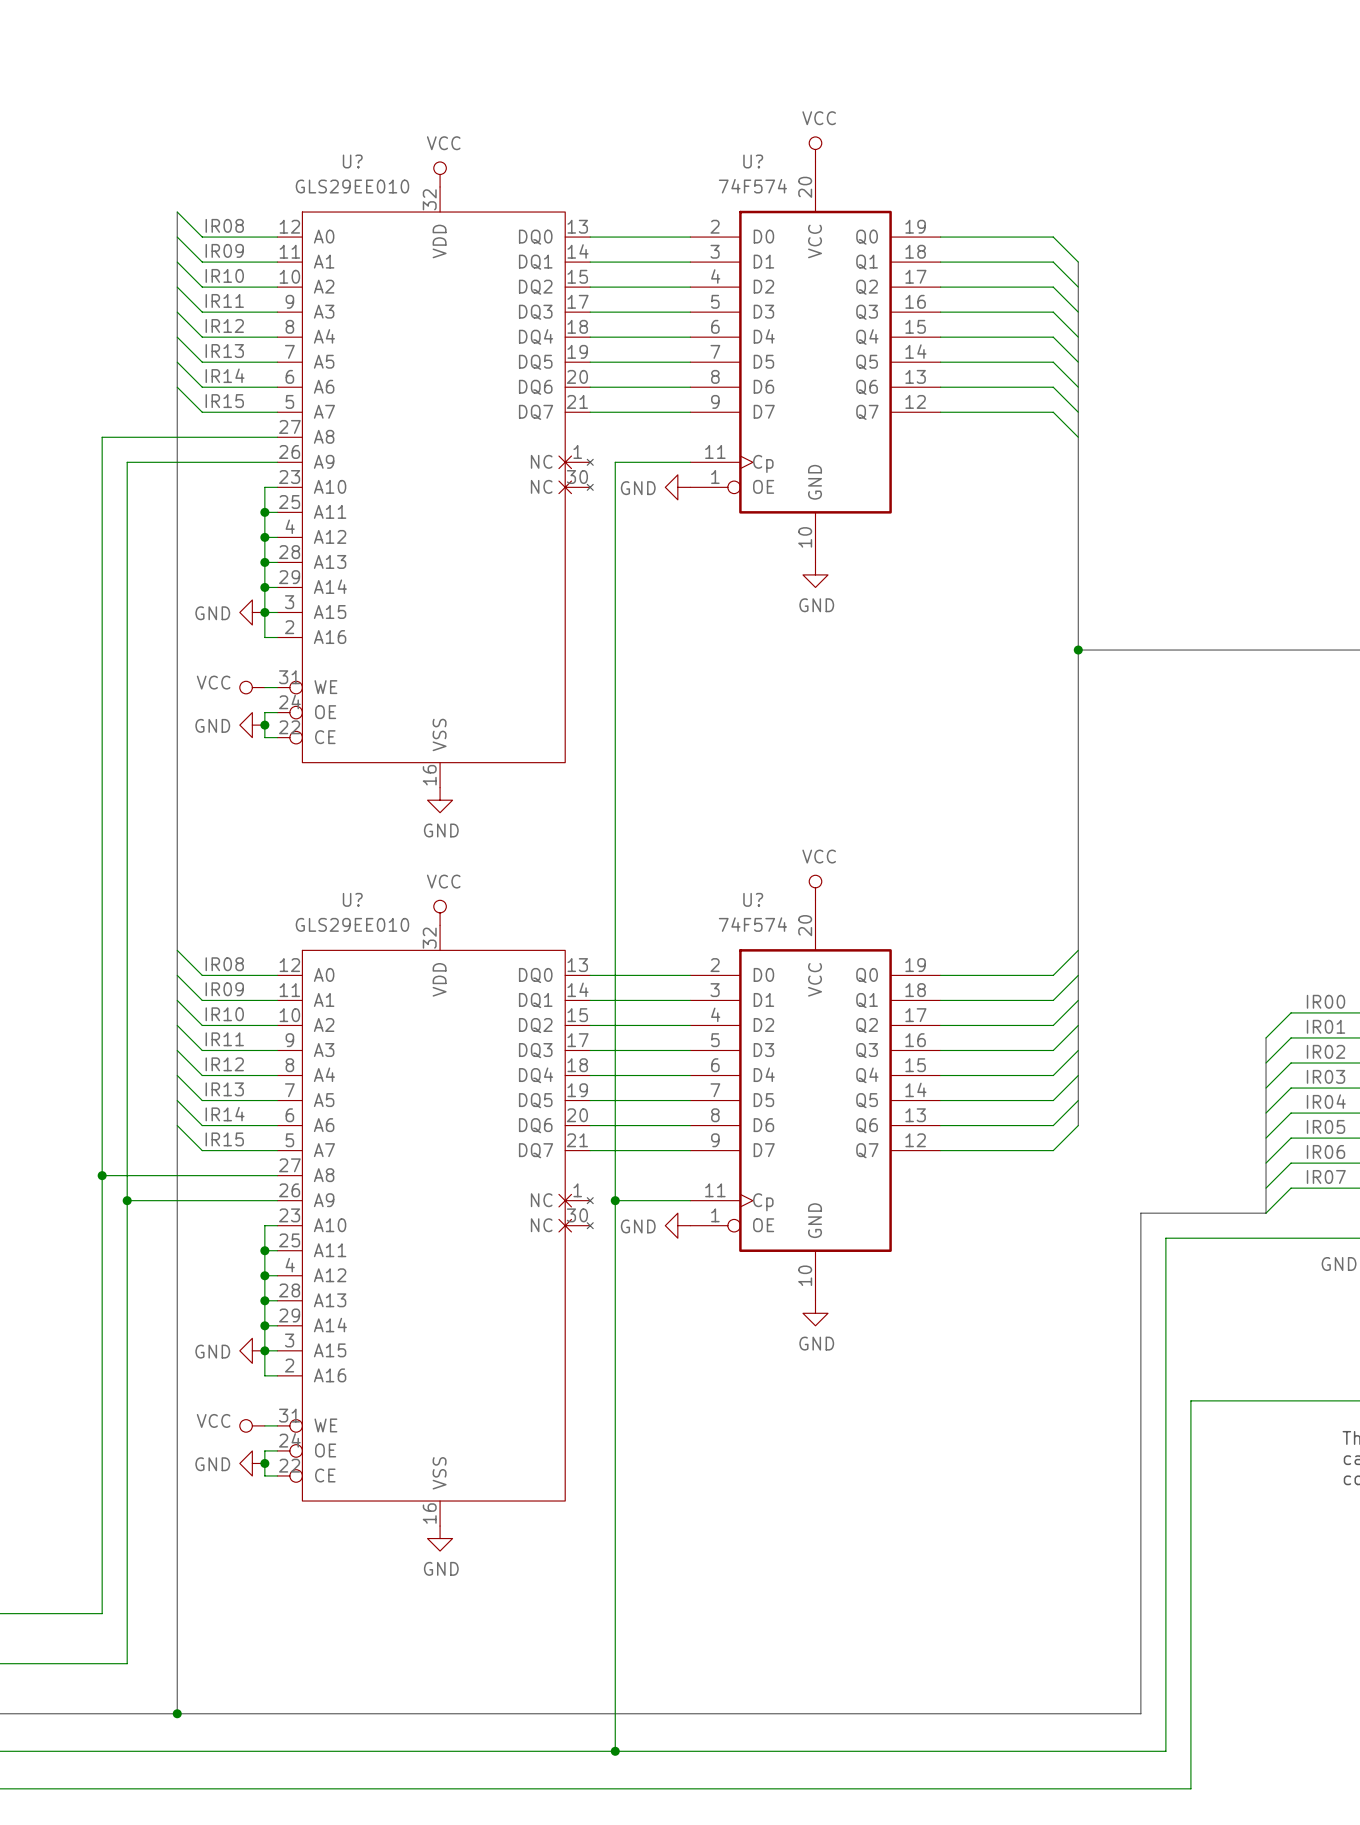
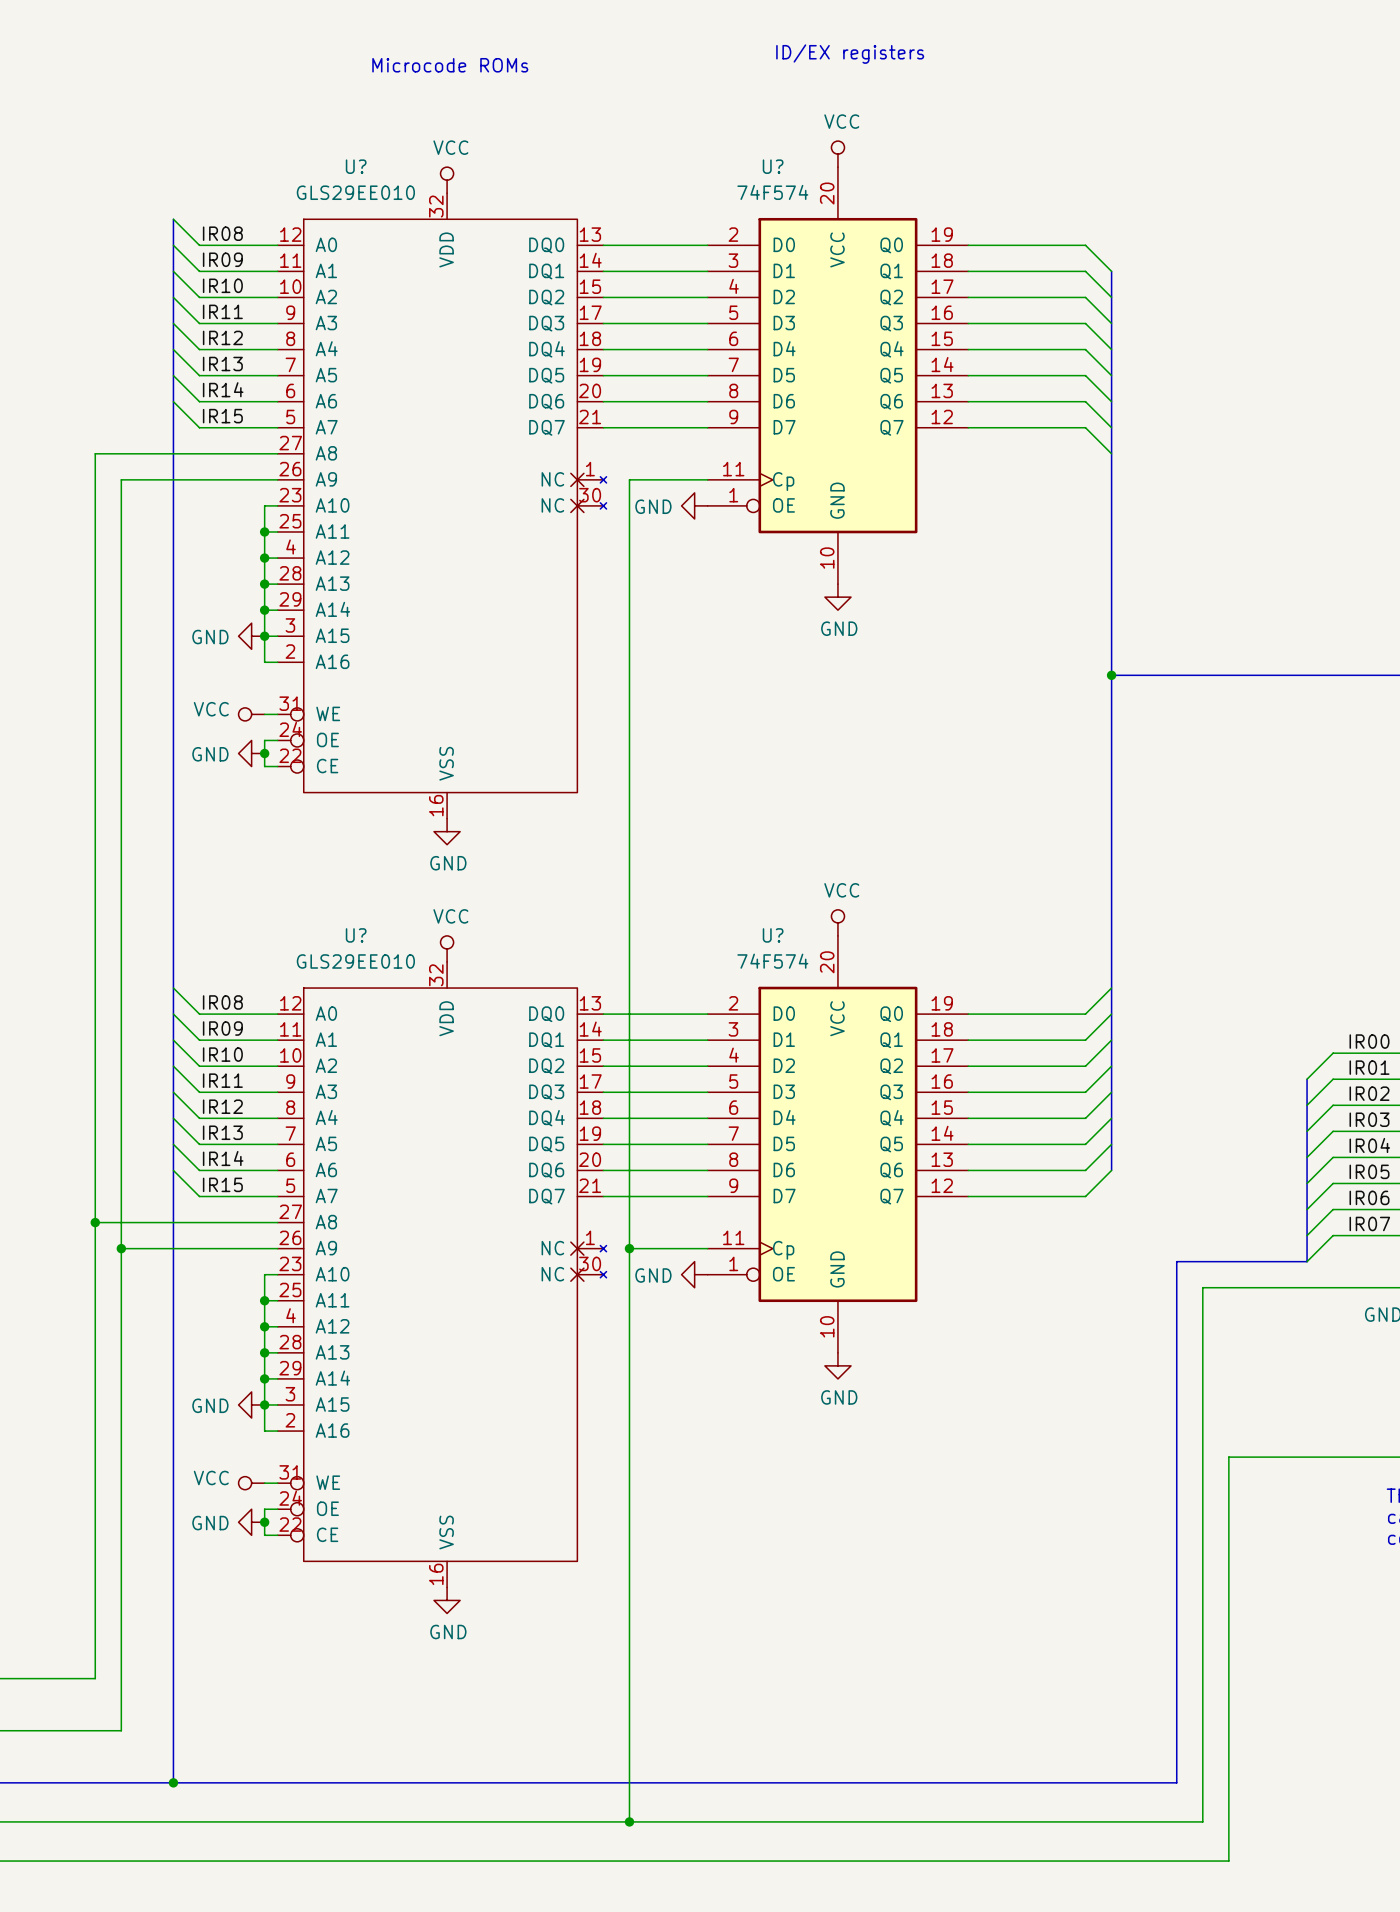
text: none -> ID/EX registers (850, 54)
text: none -> Microcode ROMs (450, 65)

